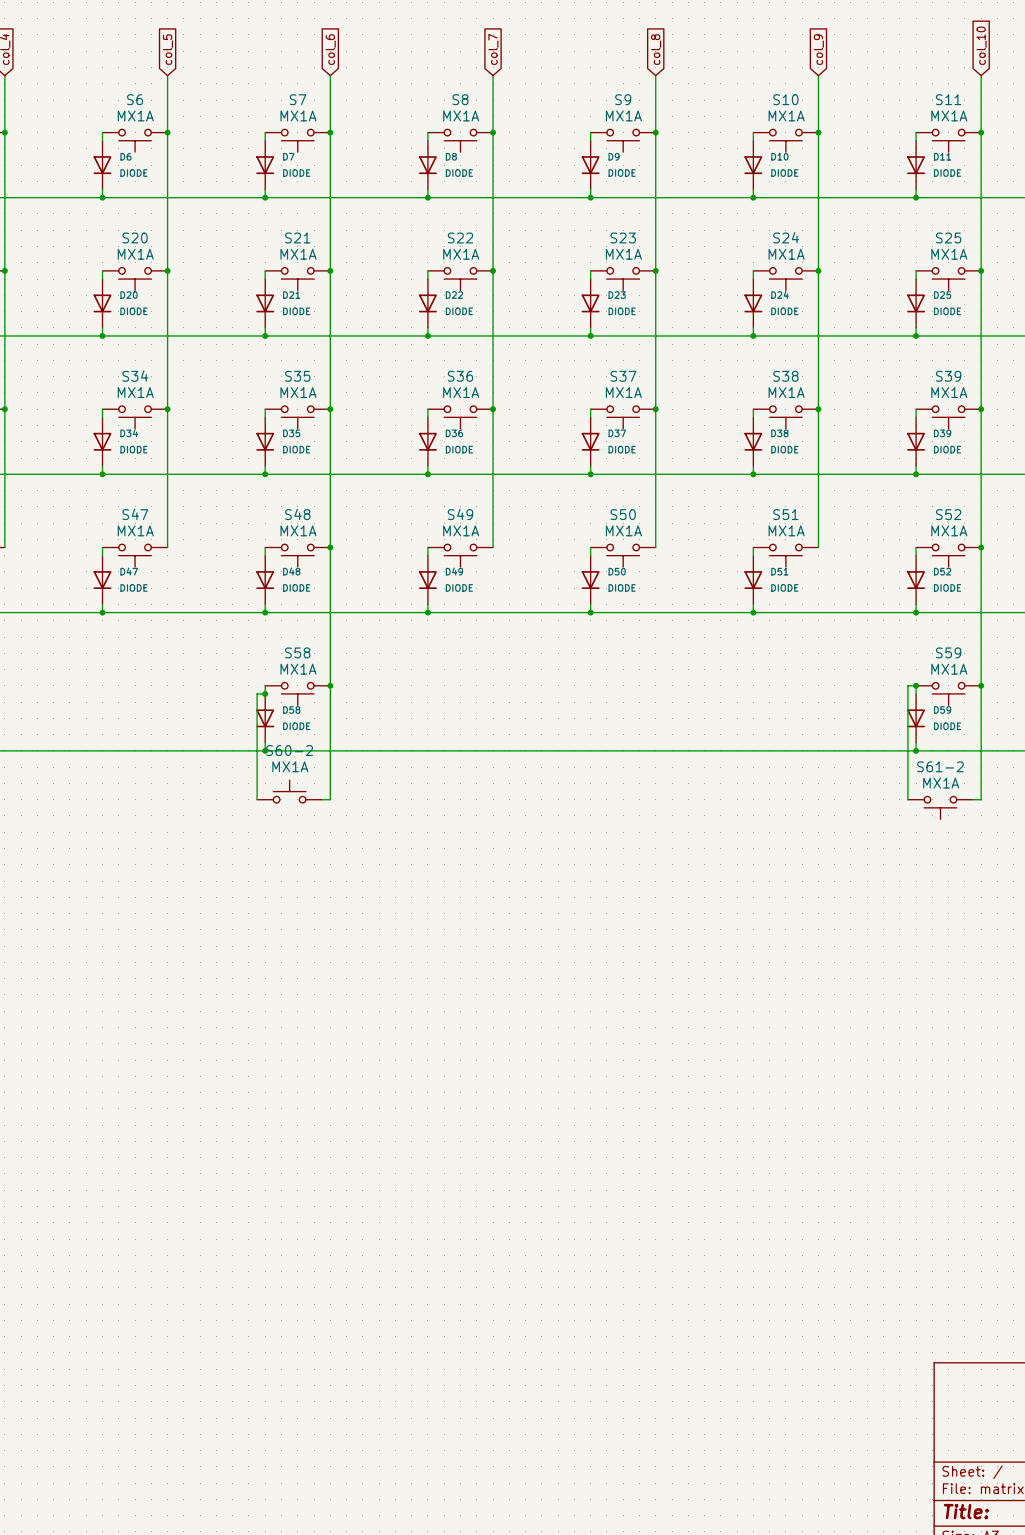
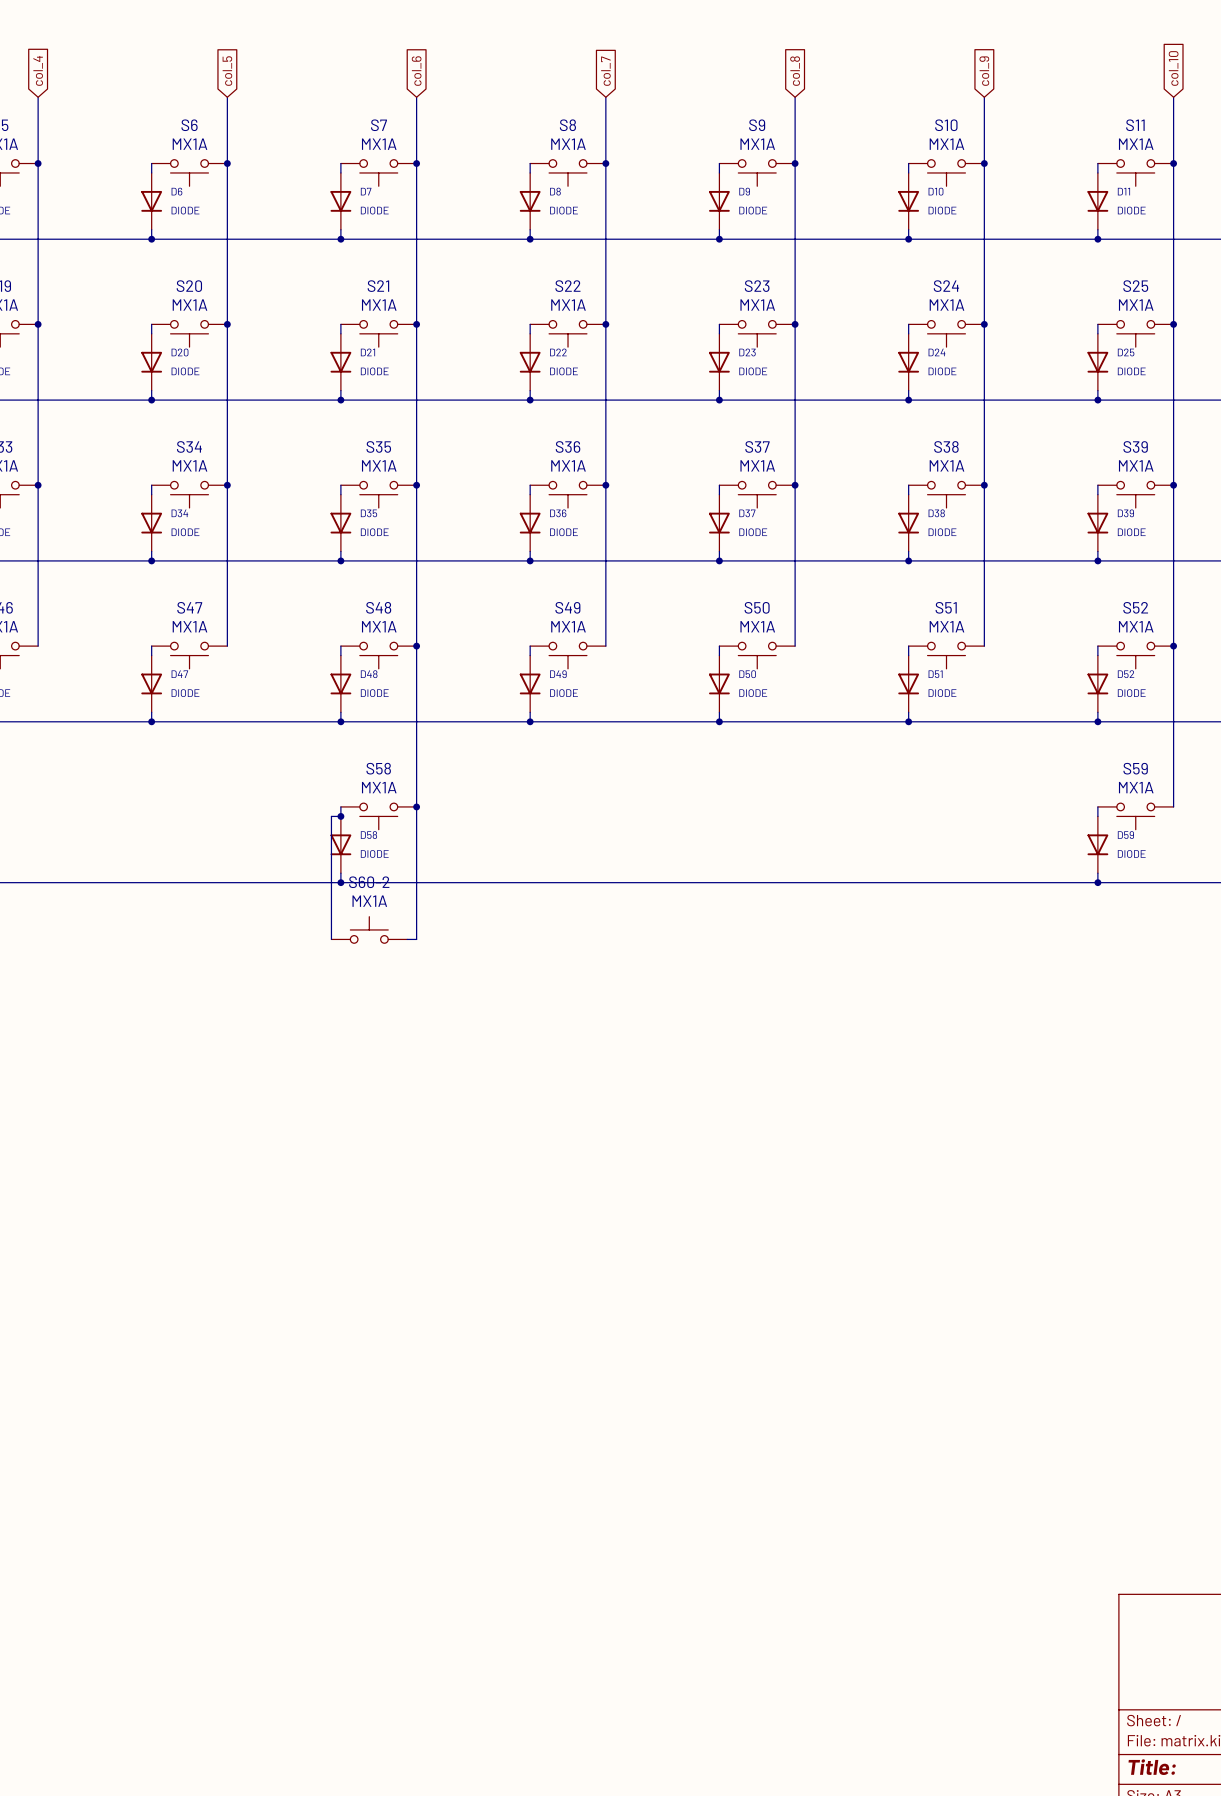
wire: (916, 685) (907, 685) (907, 799) -> none
junction: (916, 685) -> none
wire: (981, 685) (981, 799) (973, 799) -> none
junction: (981, 685) -> none
S61-2: MX1A (940, 807) -> none

